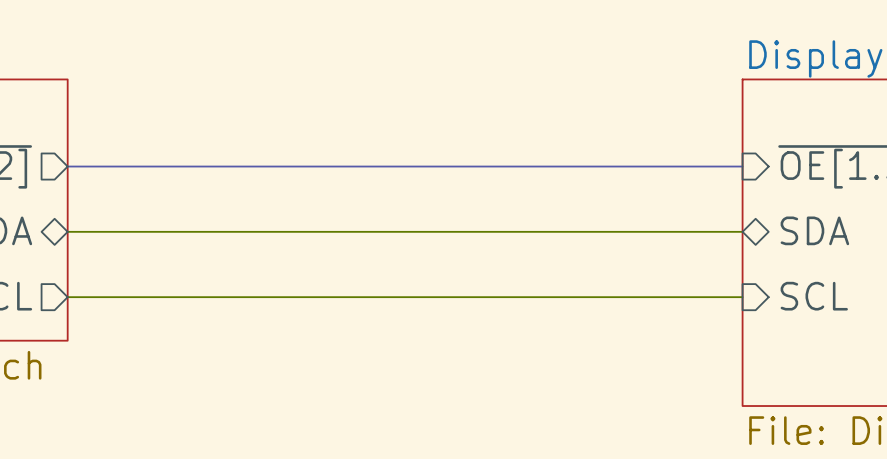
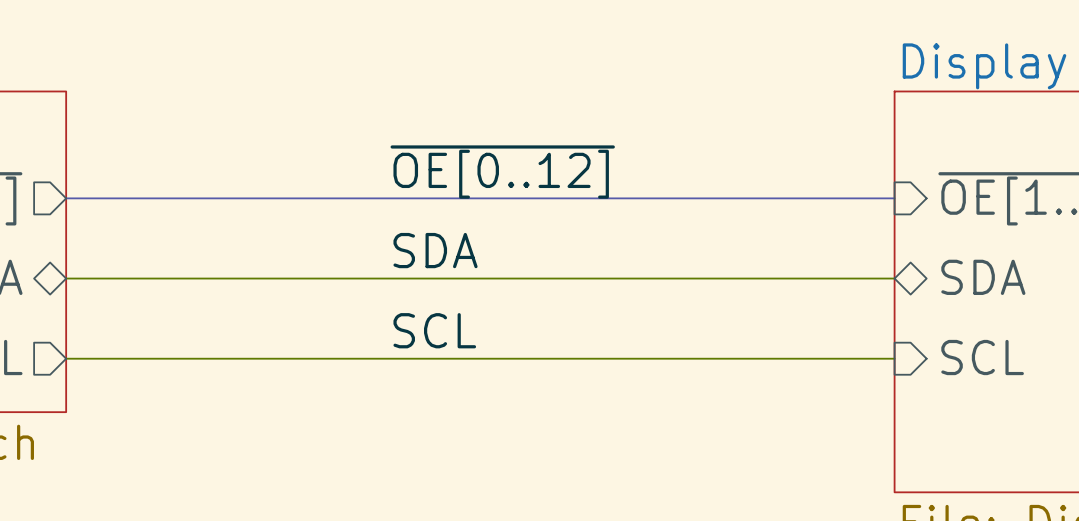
label: none -> ~{OE[0..12]} (502, 172)
label: none -> SDA (435, 250)
label: none -> SCL (434, 330)

